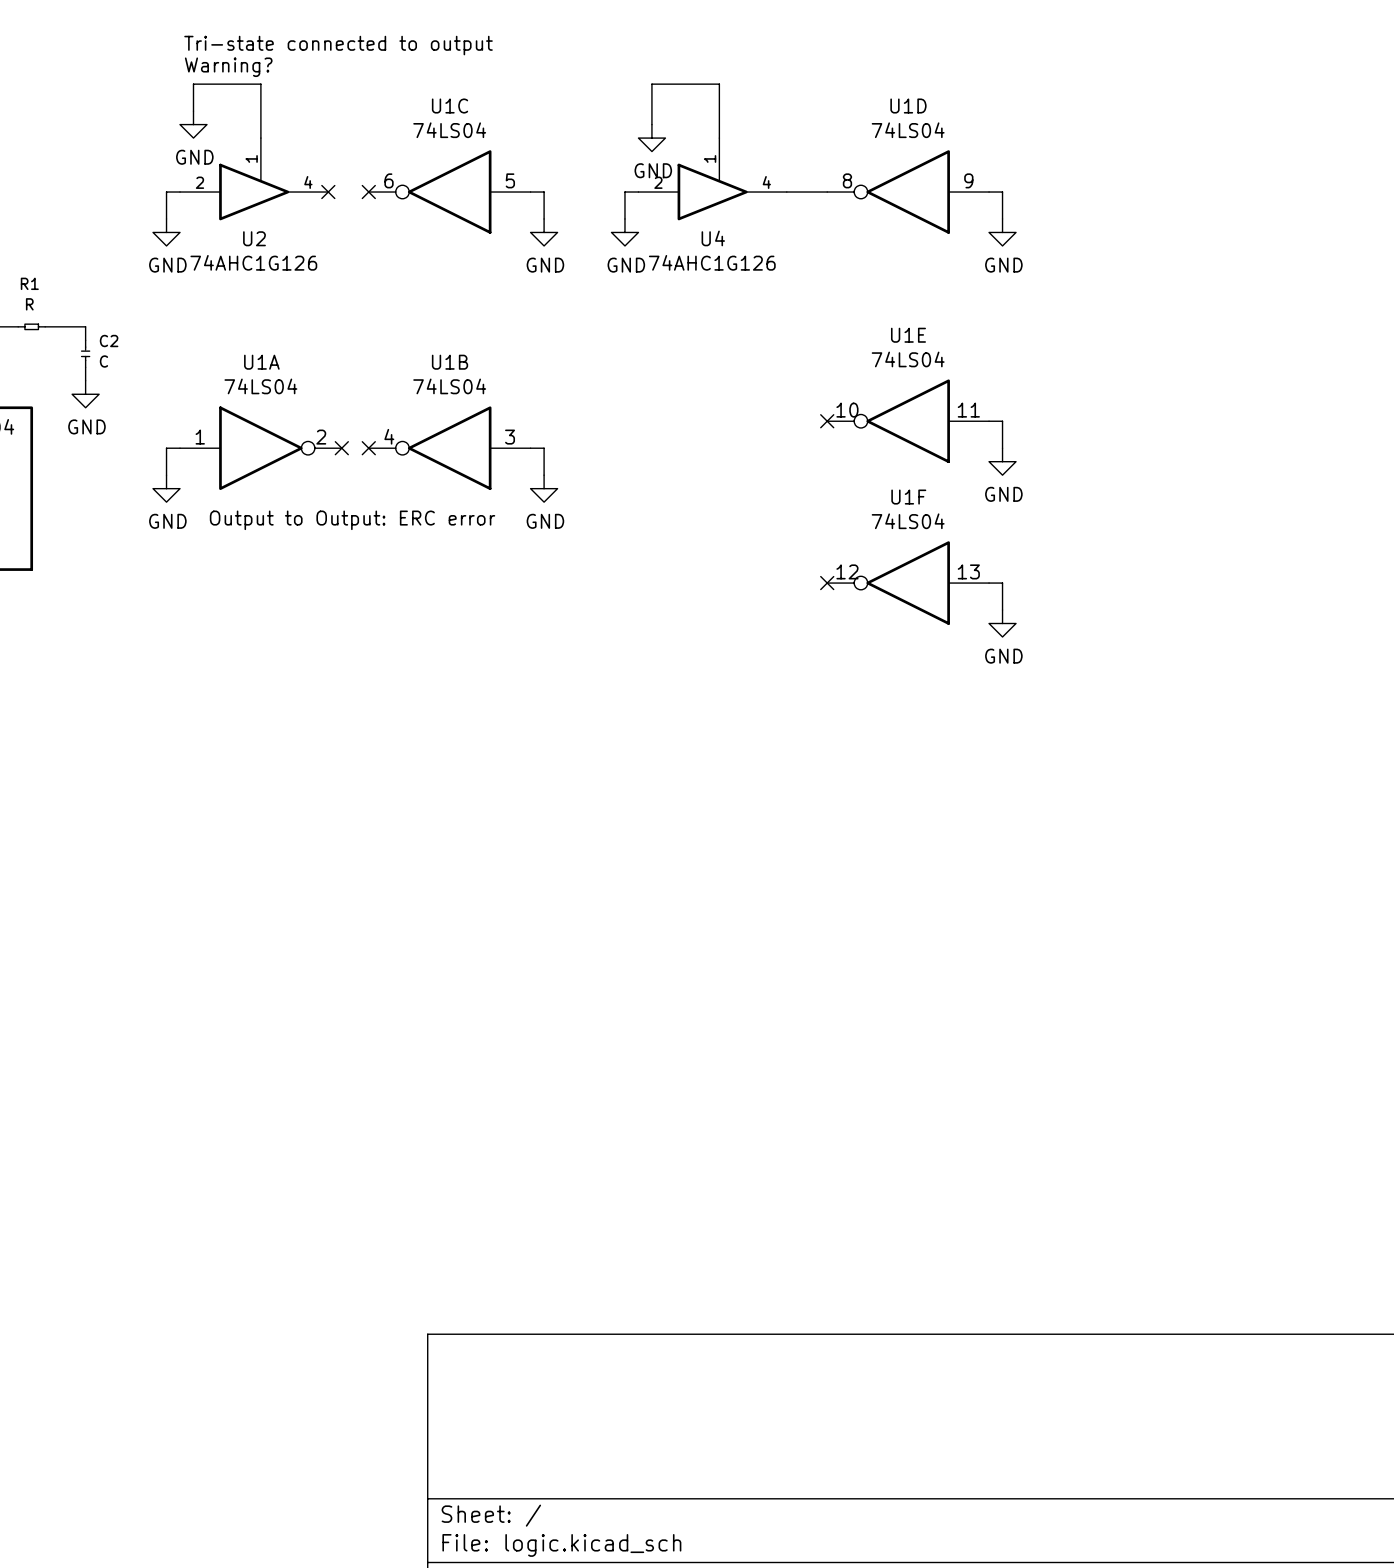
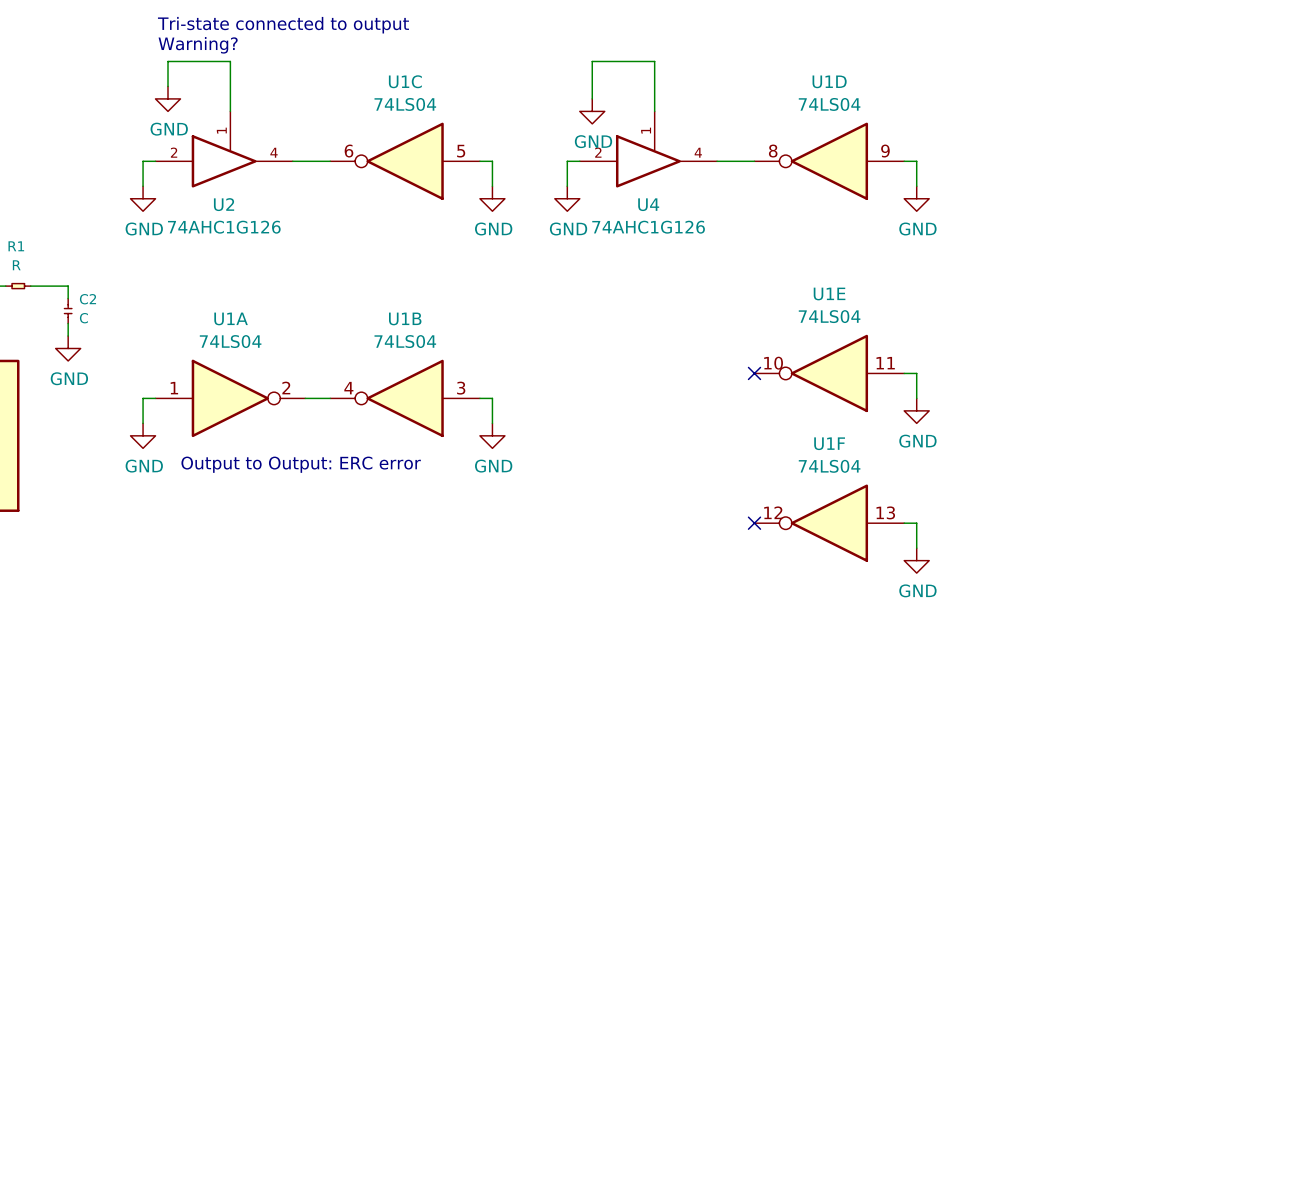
wire: none -> (292, 161) (330, 161)
no-connect mark: (328, 192) -> none
no-connect mark: (368, 192) -> none
wire: none -> (305, 398) (330, 398)
no-connect mark: (341, 448) -> none
no-connect mark: (368, 448) -> none

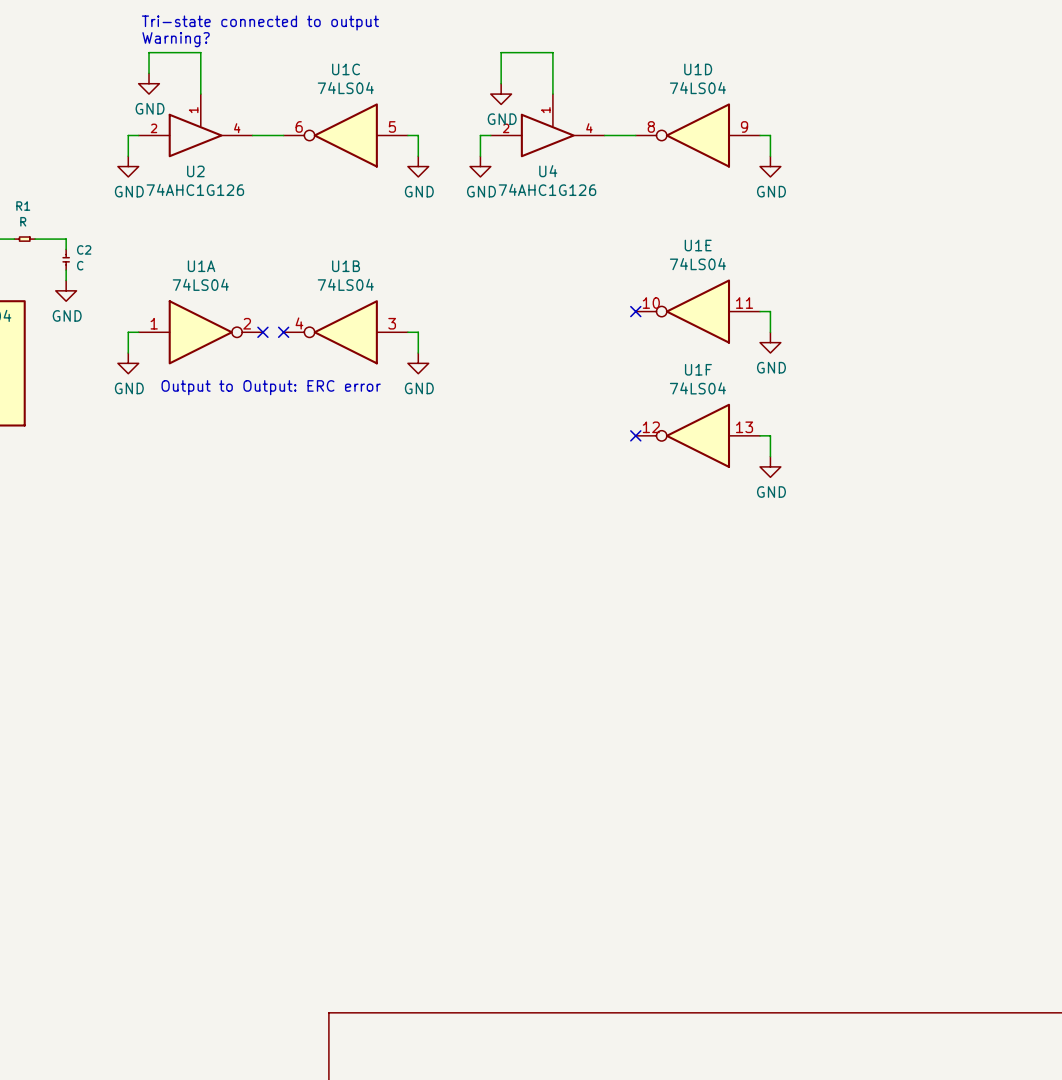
wire: (305, 398) (330, 398) -> none
no-connect mark: none -> (262, 332)
no-connect mark: none -> (283, 332)

